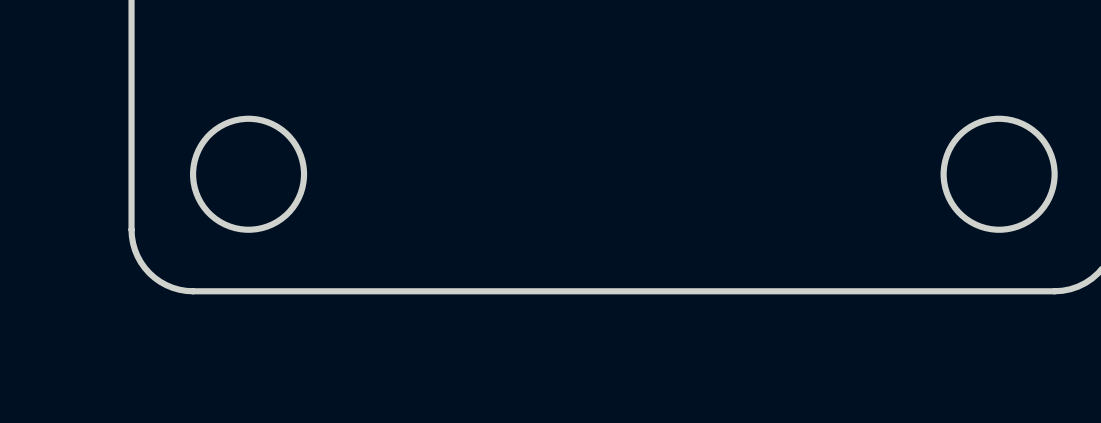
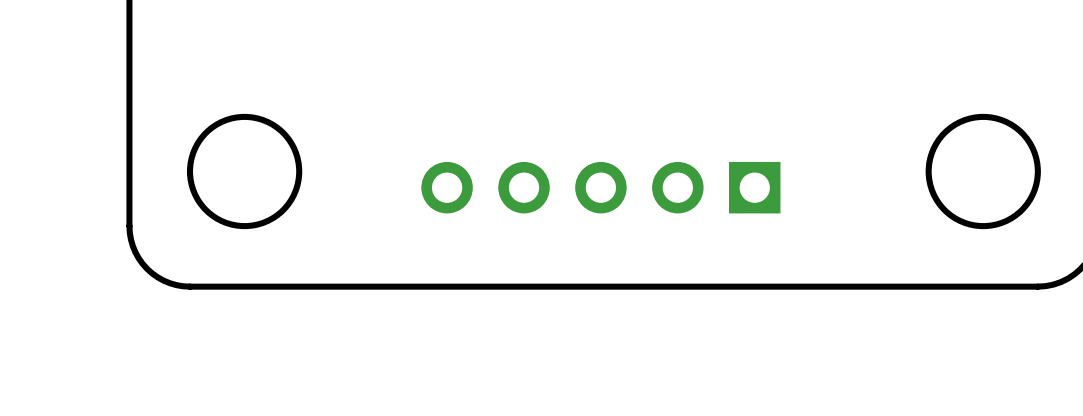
part: none -> (600, 187)

